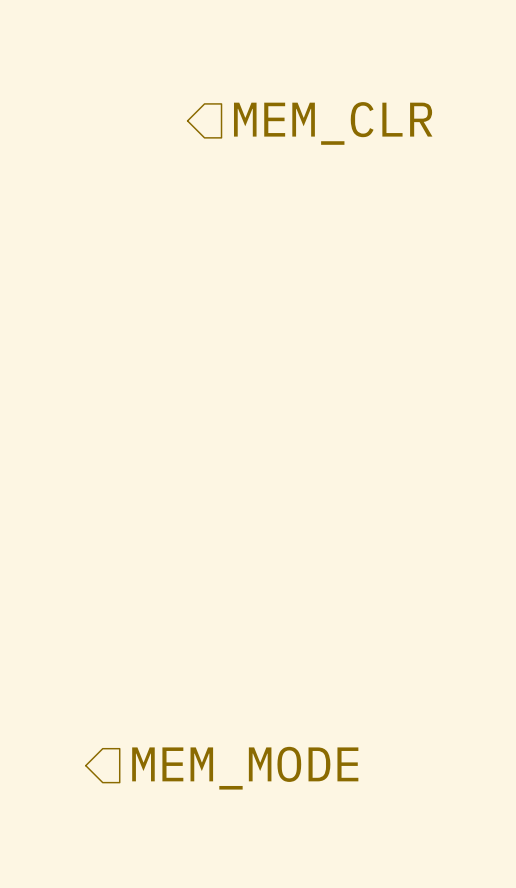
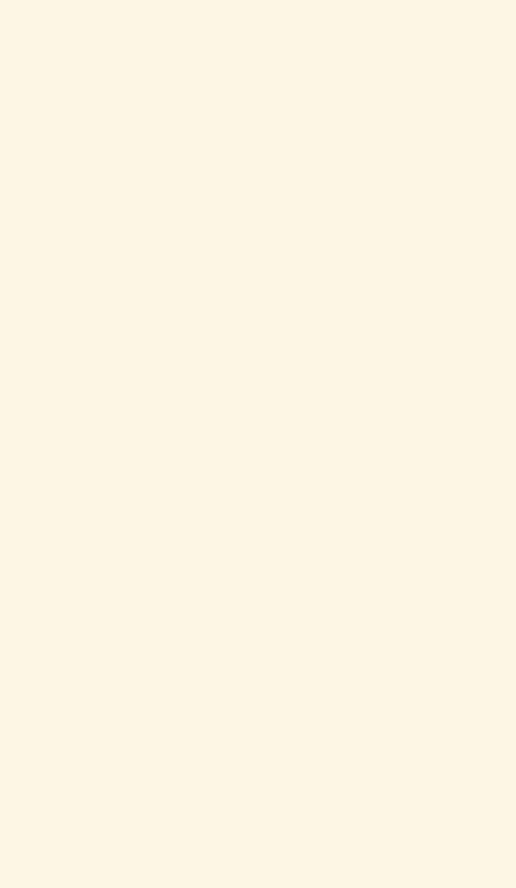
hierarchical label: MEM_CLR (333, 123) -> none
hierarchical label: MEM_MODE (245, 768) -> none

